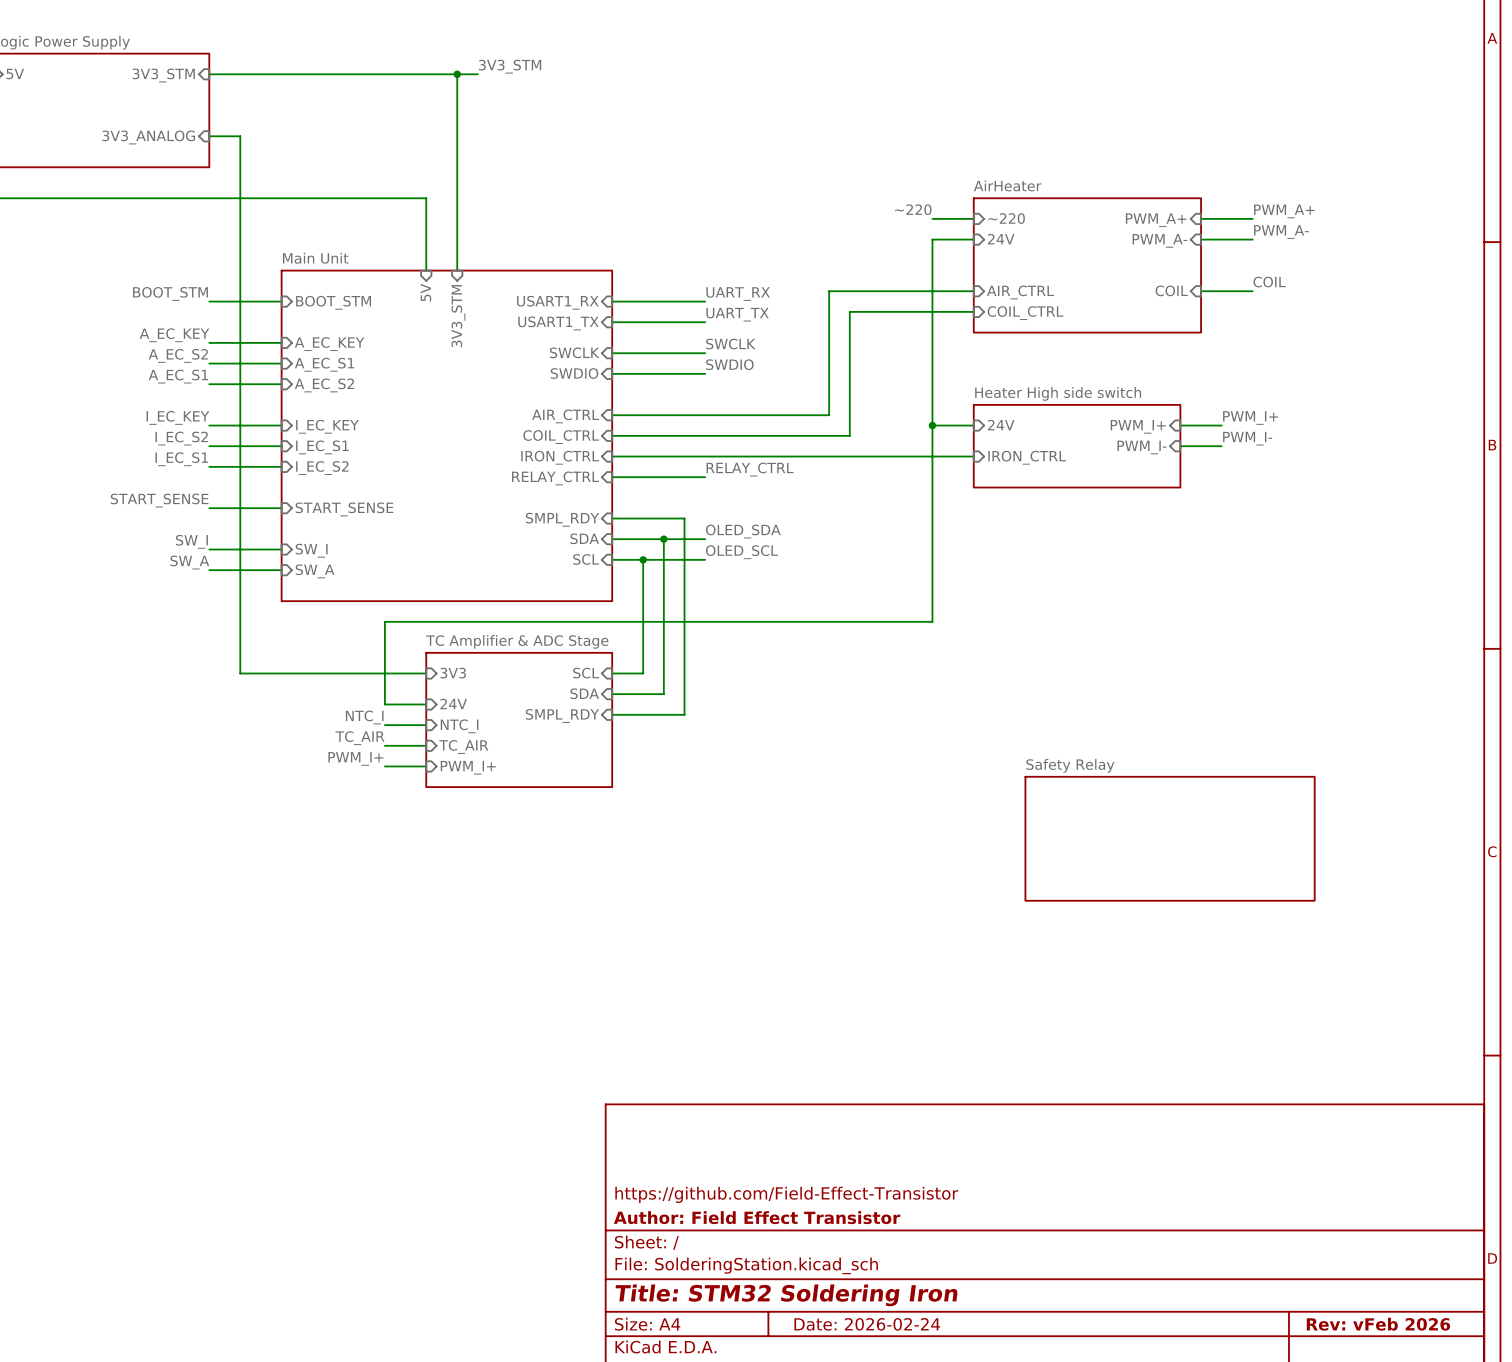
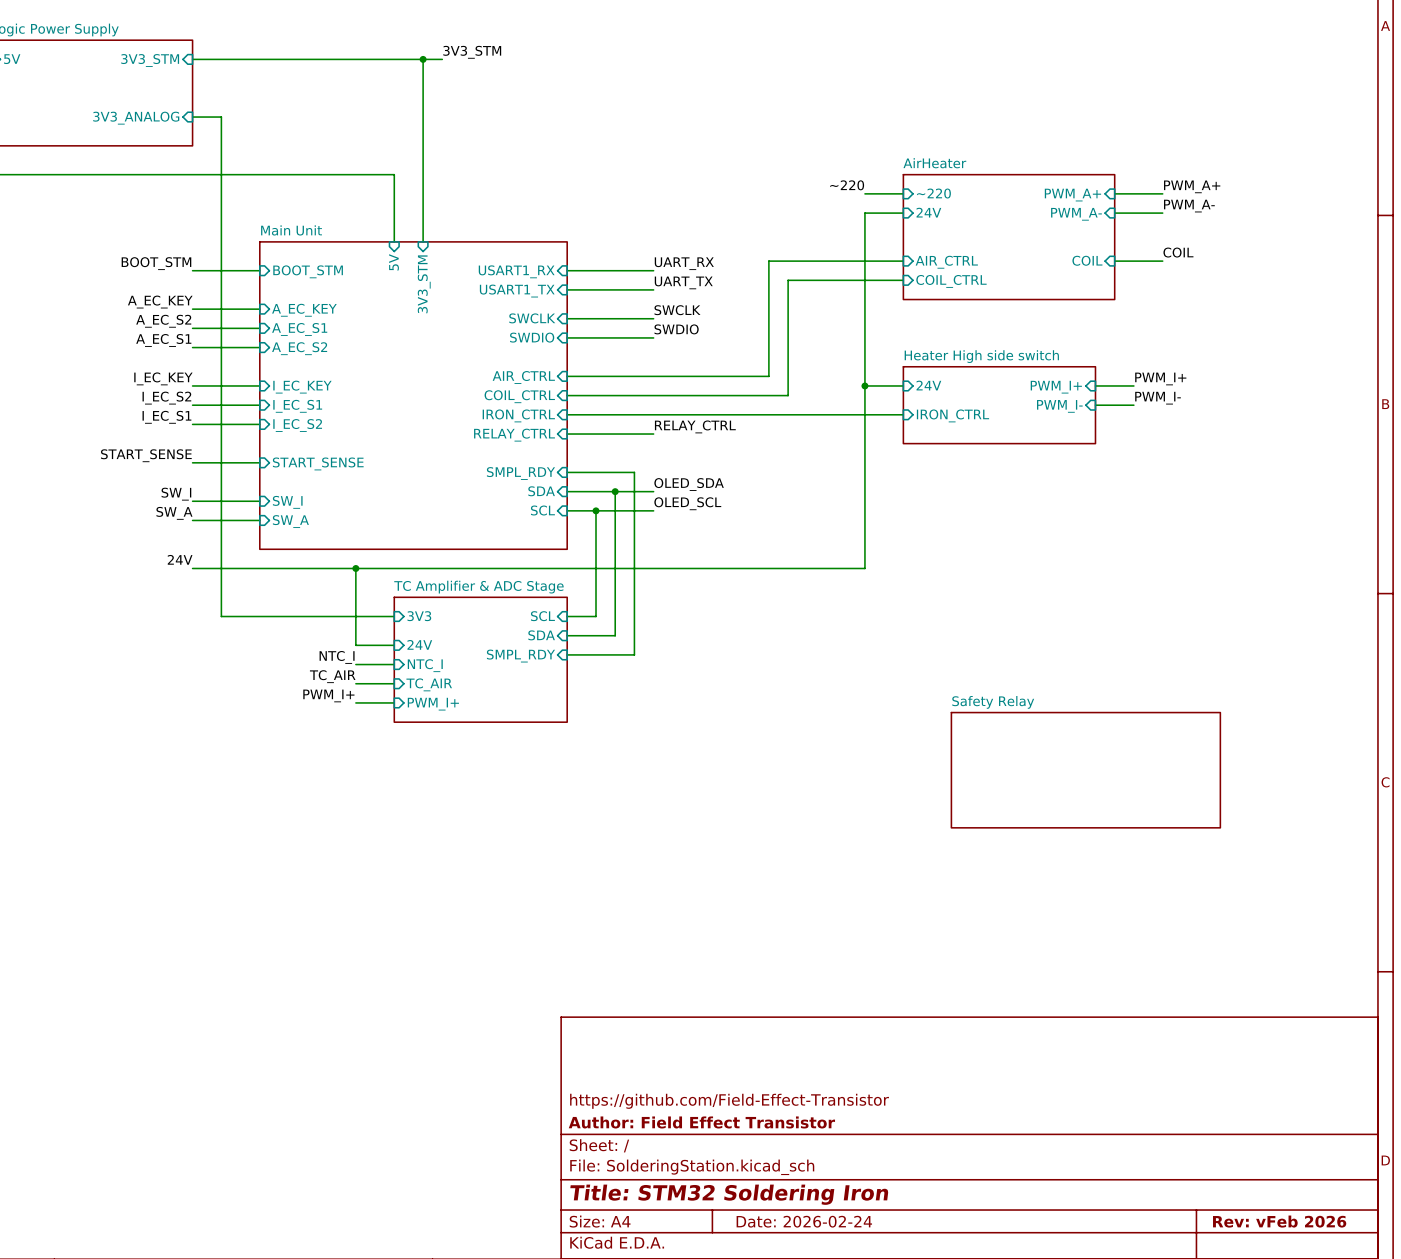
label: none -> 24V (180, 559)
wire: none -> (192, 568) (355, 568)
junction: none -> (355, 568)

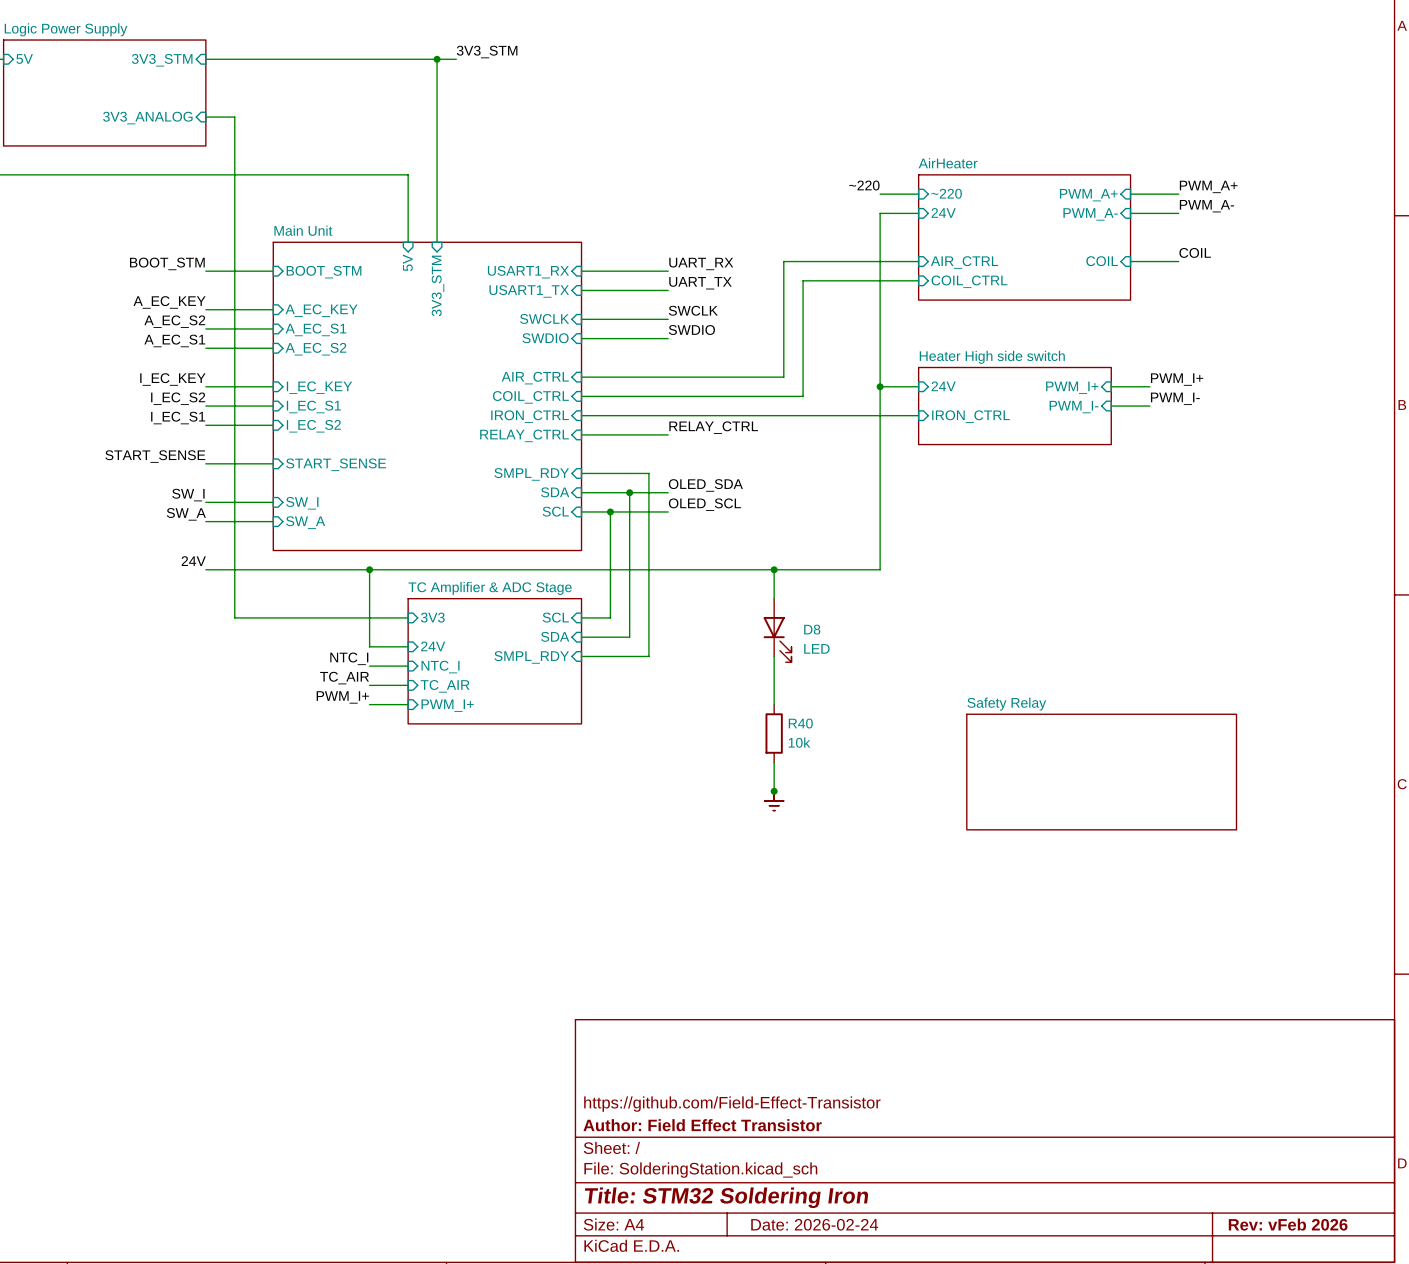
wire: none -> (774, 569) (774, 598)
junction: none -> (774, 569)
D8: none -> LED (777, 630)
wire: none -> (774, 656) (774, 704)
R40: none -> 10k (774, 733)
wire: none -> (774, 762) (774, 791)
junction: none -> (774, 791)
power symbol: none -> (774, 800)

